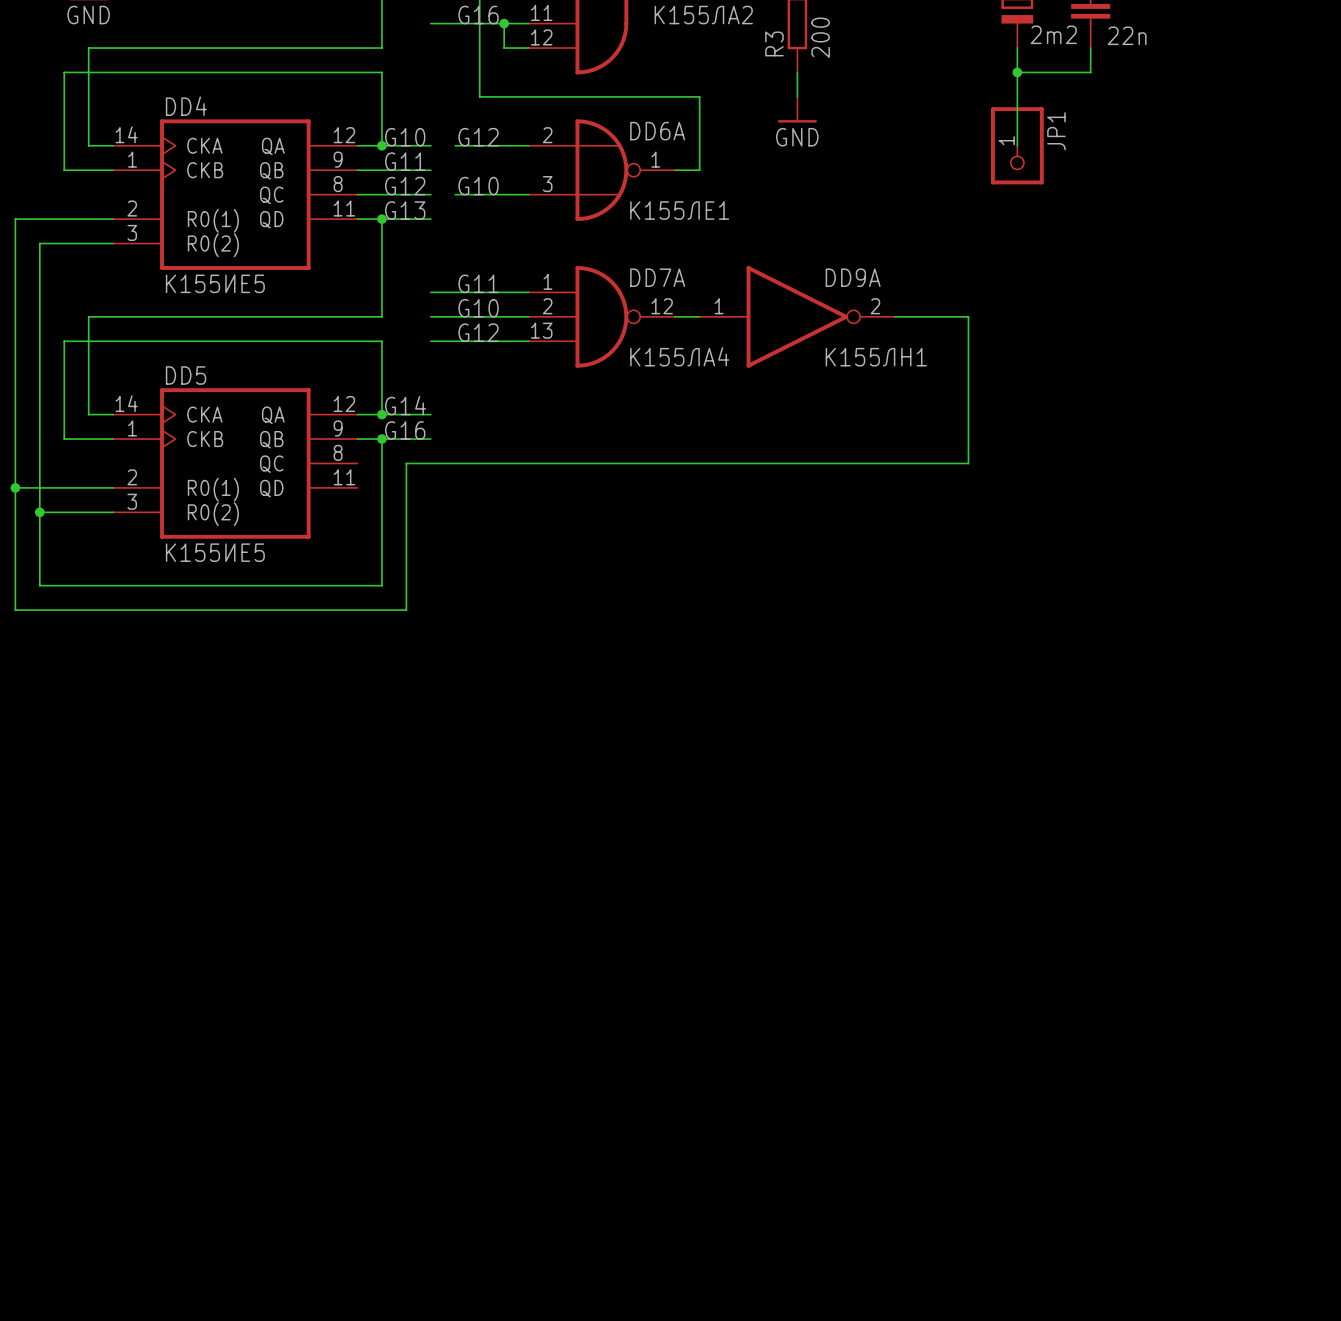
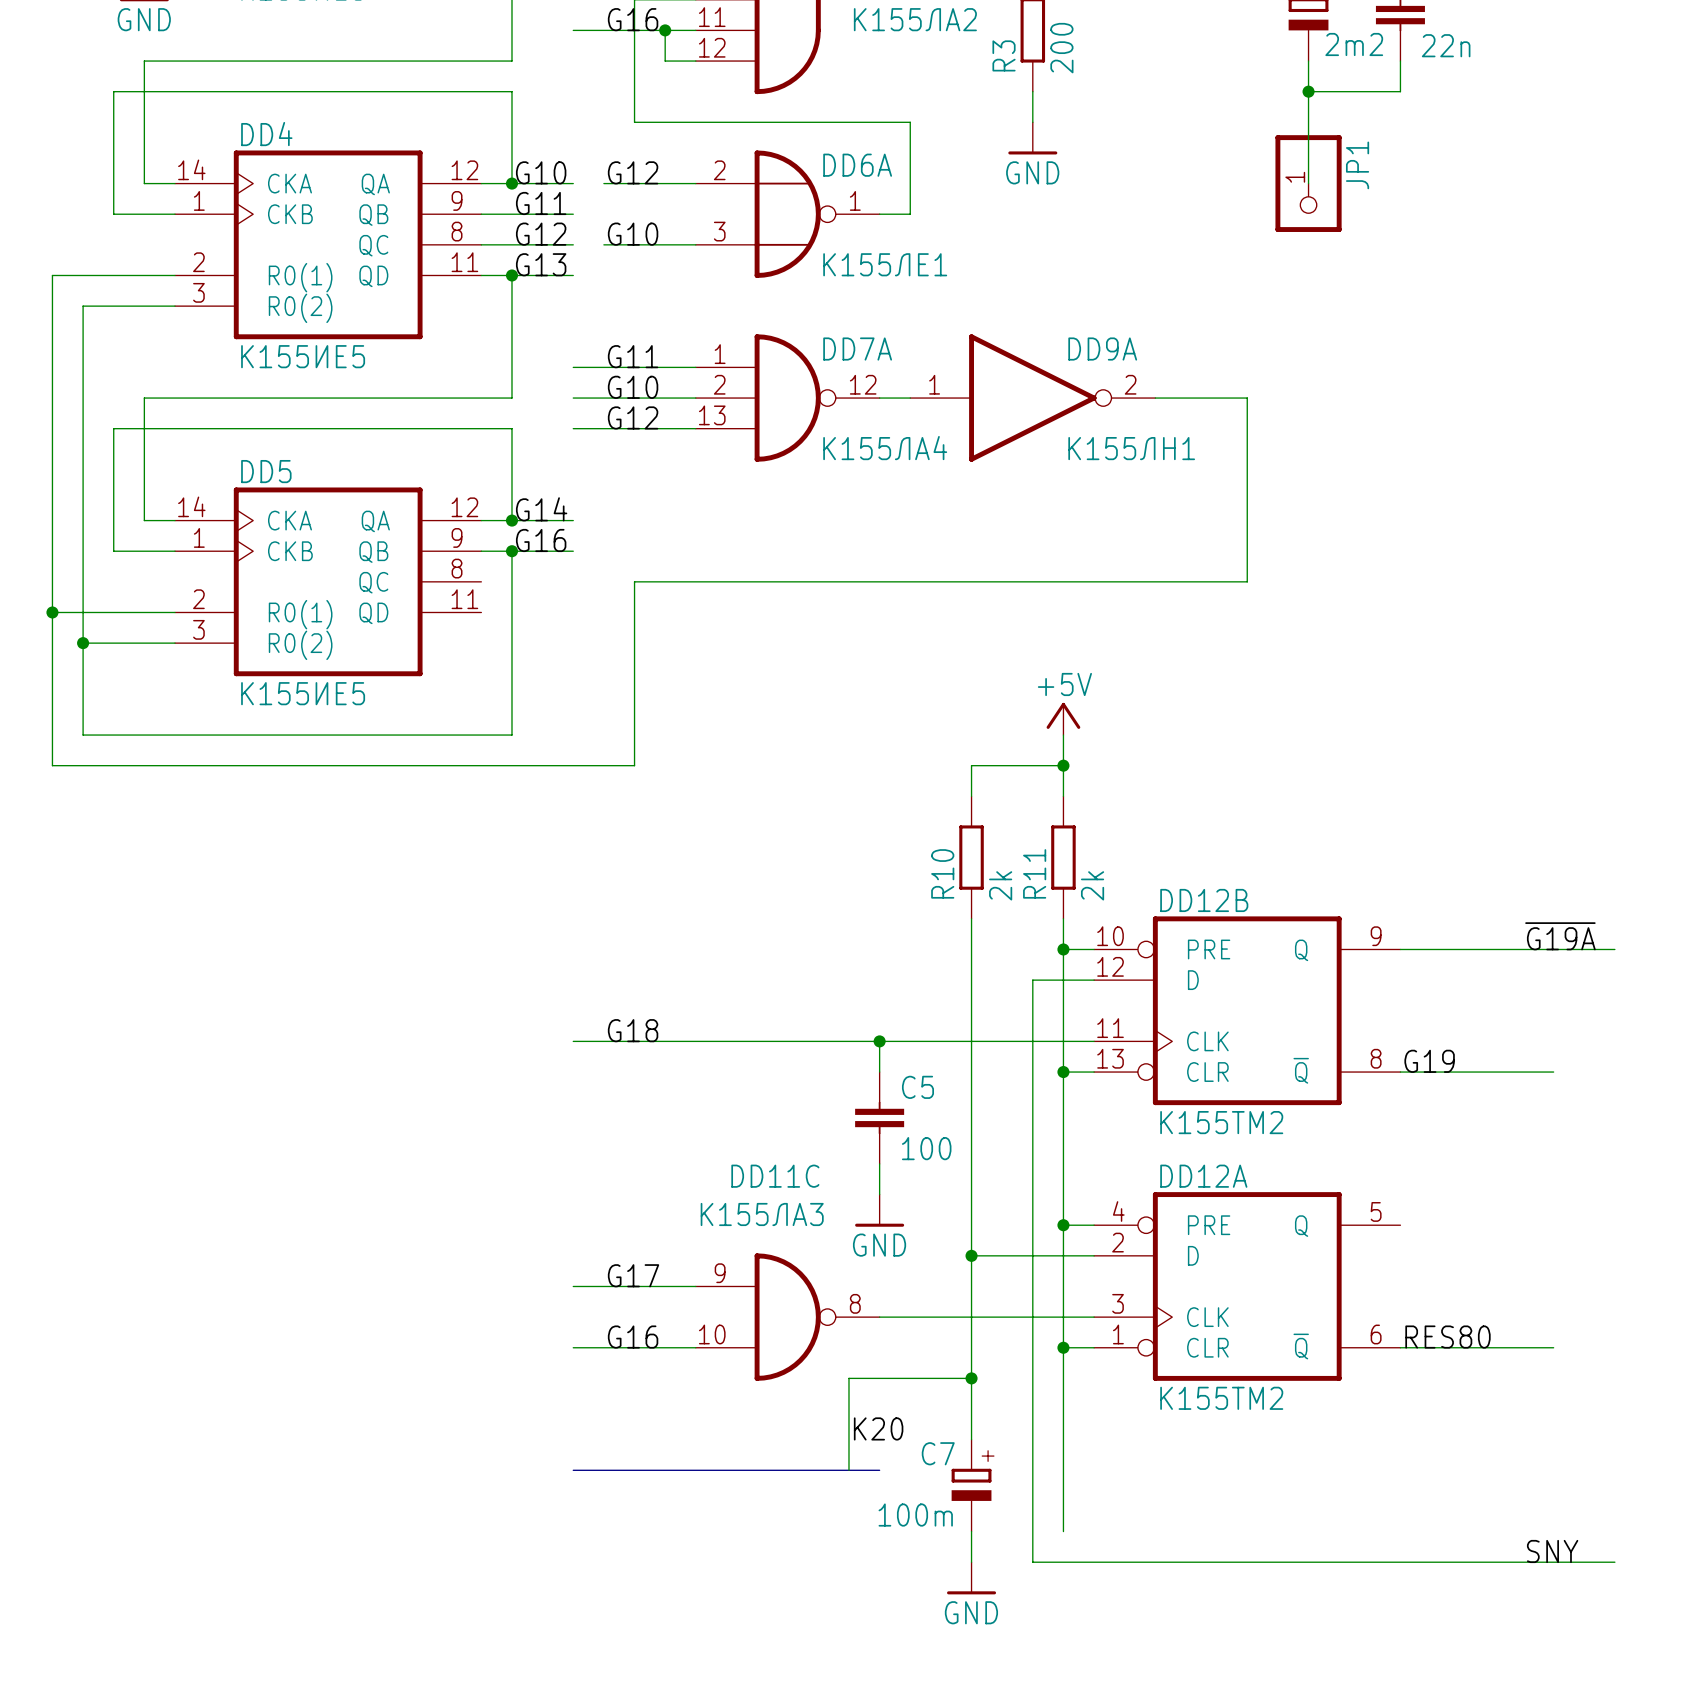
wire: (479, 463) (406, 463) (406, 610) -> (634, 581) (634, 765) (542, 765)
power symbol: none -> +5V (1063, 718)
wire: none -> (1063, 735) (1063, 796)
wire: none -> (1063, 765) (971, 765) (971, 796)
junction: none -> (1063, 765)
R10: none -> 2k (971, 857)
R11: none -> 2k (1063, 857)
wire: none -> (971, 918) (971, 1439)
wire: none -> (1063, 918) (1063, 1531)
label: none -> ~{G19A} (1560, 936)
wire: none -> (1063, 949) (1094, 949)
junction: none -> (1063, 949)
wire: none -> (1400, 949) (1614, 949)
wire: none -> (1094, 980) (1032, 980) (1032, 1562) (1614, 1562)
DD12B: none -> К155ТМ2 (1247, 1010)
label: none -> G18 (633, 1030)
wire: none -> (573, 1041) (1094, 1041)
wire: none -> (879, 1041) (879, 1072)
junction: none -> (879, 1041)
label: none -> G19 (1429, 1061)
wire: none -> (1063, 1072) (1094, 1072)
junction: none -> (1063, 1072)
wire: none -> (1400, 1072) (1553, 1072)
C5: none -> 100 (879, 1117)
wire: none -> (879, 1163) (879, 1194)
power symbol: none -> GND (879, 1210)
wire: none -> (1063, 1225) (1094, 1225)
junction: none -> (1063, 1225)
wire: none -> (971, 1255) (1094, 1255)
junction: none -> (971, 1255)
label: none -> G17 (633, 1275)
wire: none -> (573, 1286) (695, 1286)
DD12A: none -> К155ТМ2 (1247, 1286)
DD11C: none -> К155ЛА3 (787, 1317)
wire: none -> (879, 1317) (1094, 1317)
label: none -> G16 (633, 1337)
label: none -> RES80 (1447, 1337)
wire: none -> (573, 1347) (695, 1347)
wire: none -> (1063, 1347) (1094, 1347)
junction: none -> (1063, 1347)
wire: none -> (1400, 1347) (1553, 1347)
wire: none -> (971, 1378) (848, 1378) (848, 1470)
junction: none -> (971, 1378)
label: none -> K20 (878, 1428)
bus: none -> (573, 1470) (879, 1470)
C7: none -> 100m (971, 1485)
wire: none -> (971, 1531) (971, 1562)
label: none -> SNY (1552, 1551)
power symbol: none -> GND (971, 1578)

